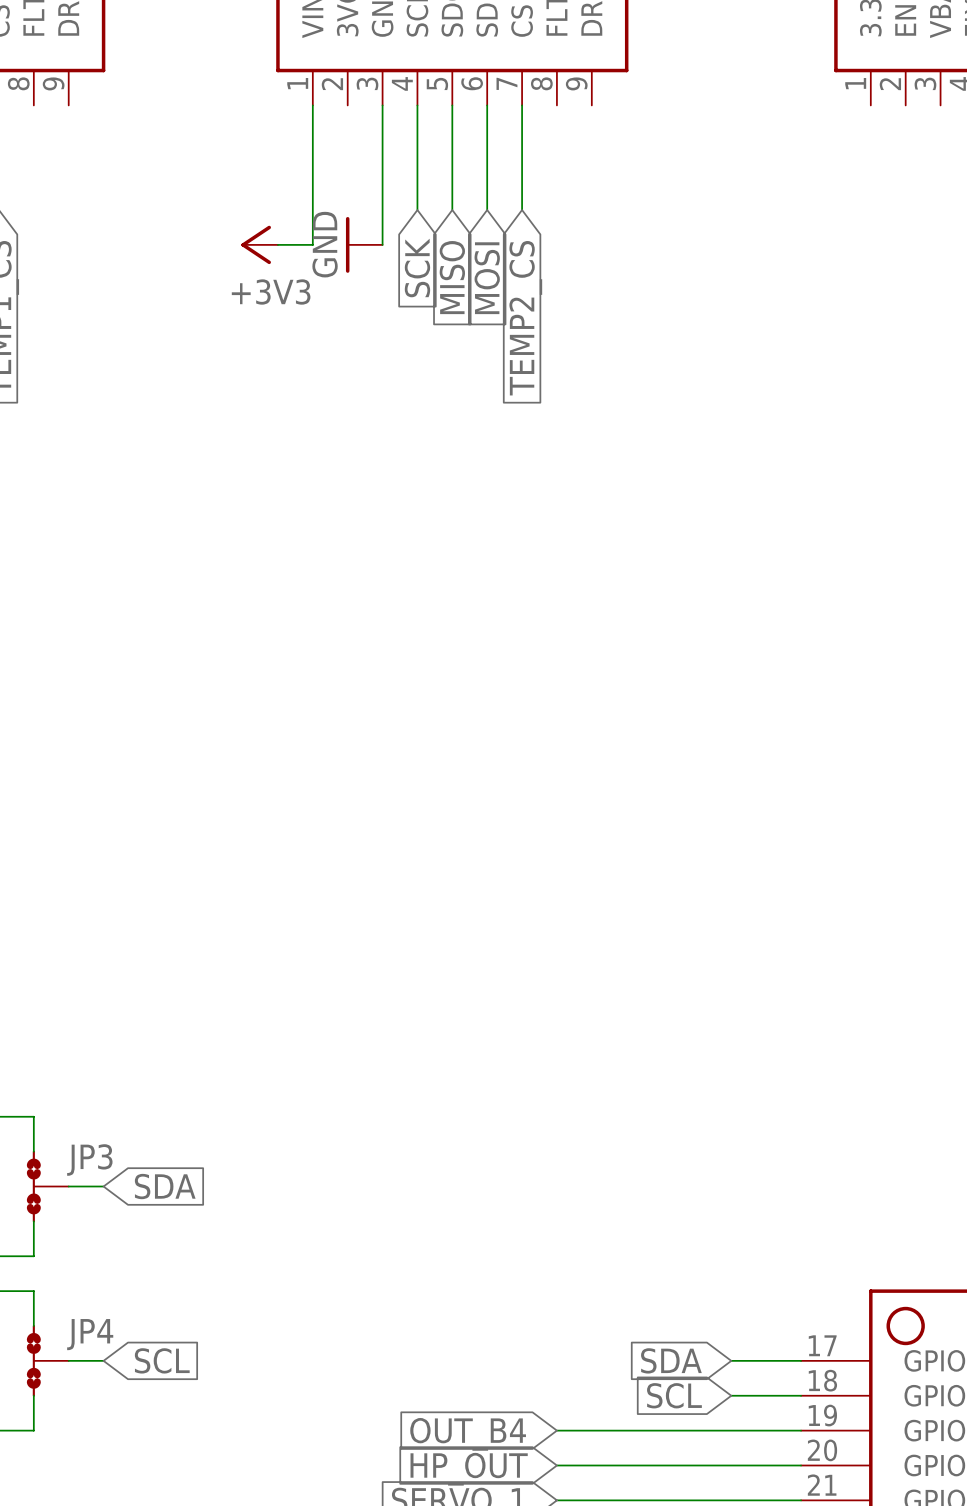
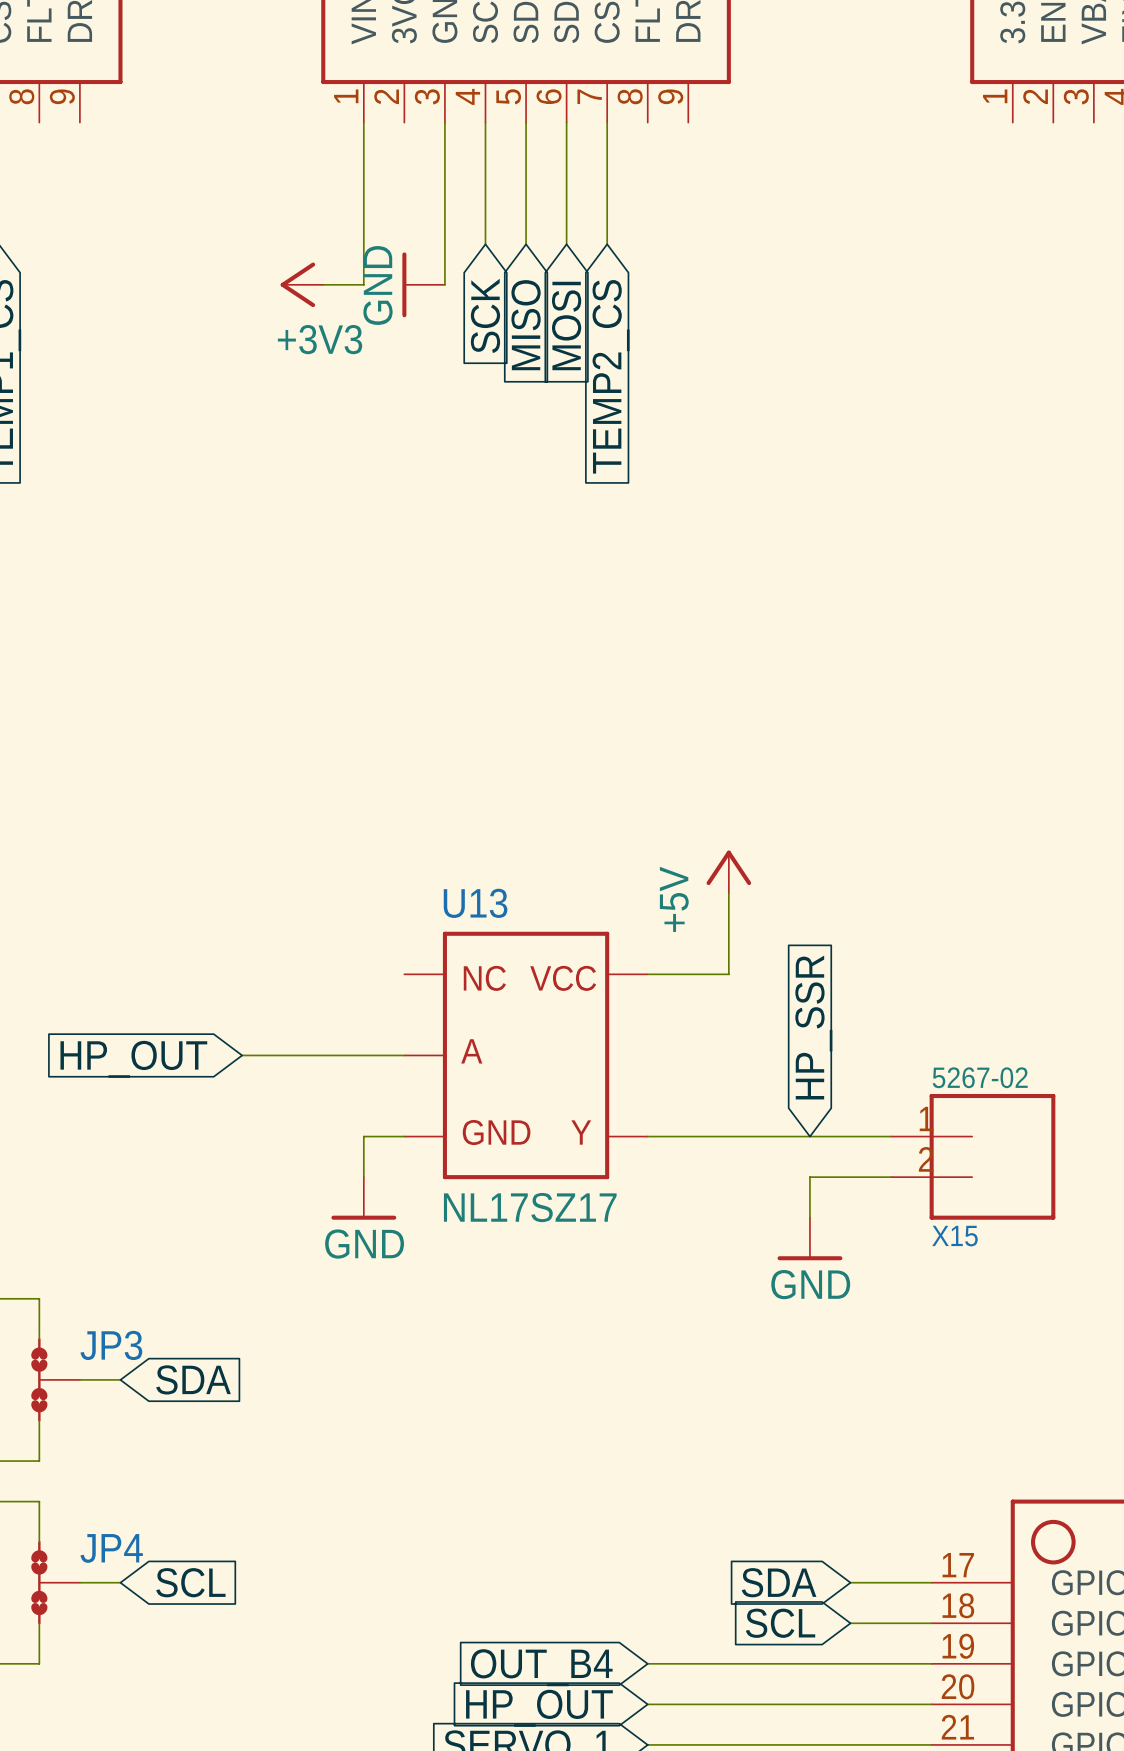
power symbol: none -> +5V (728, 871)
wire: none -> (728, 893) (728, 974) (647, 974)
global label: none -> HP_SSR (813, 1027)
wire: none -> (242, 1055) (404, 1055)
U13: none -> NL17SZ17 (526, 1055)
global label: none -> HP_OUT (133, 1059)
wire: none -> (404, 1136) (363, 1136) (363, 1177)
wire: none -> (647, 1136) (891, 1136)
X15: none -> 5267-02 (973, 1156)
wire: none -> (891, 1177) (809, 1177) (809, 1217)
power symbol: none -> GND (363, 1198)
power symbol: none -> GND (809, 1238)

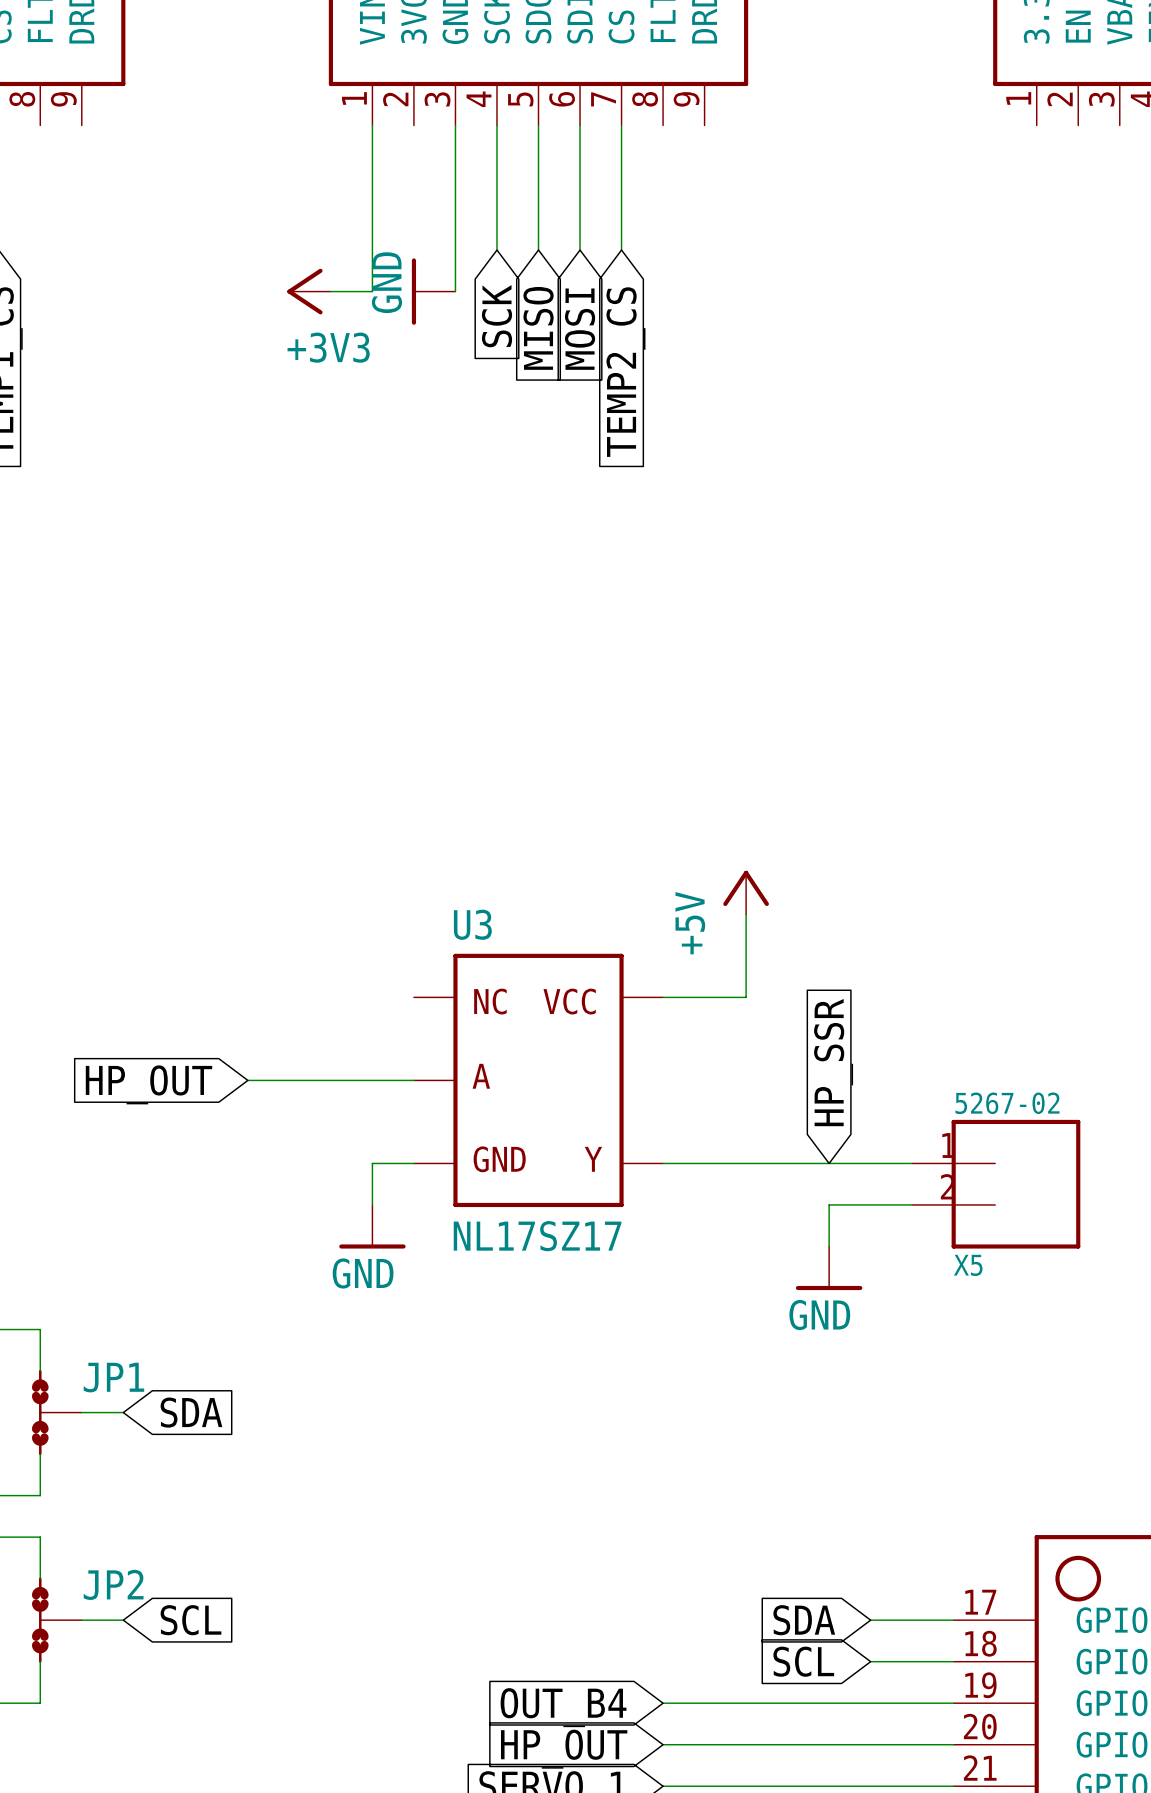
U13 name: U13 (475, 903) -> U3 (472, 924)
X15 name: X15 (954, 1236) -> X5 (968, 1265)
JP3 name: JP3 (111, 1345) -> JP1 (113, 1377)
JP4 name: JP4 (111, 1548) -> JP2 (113, 1584)

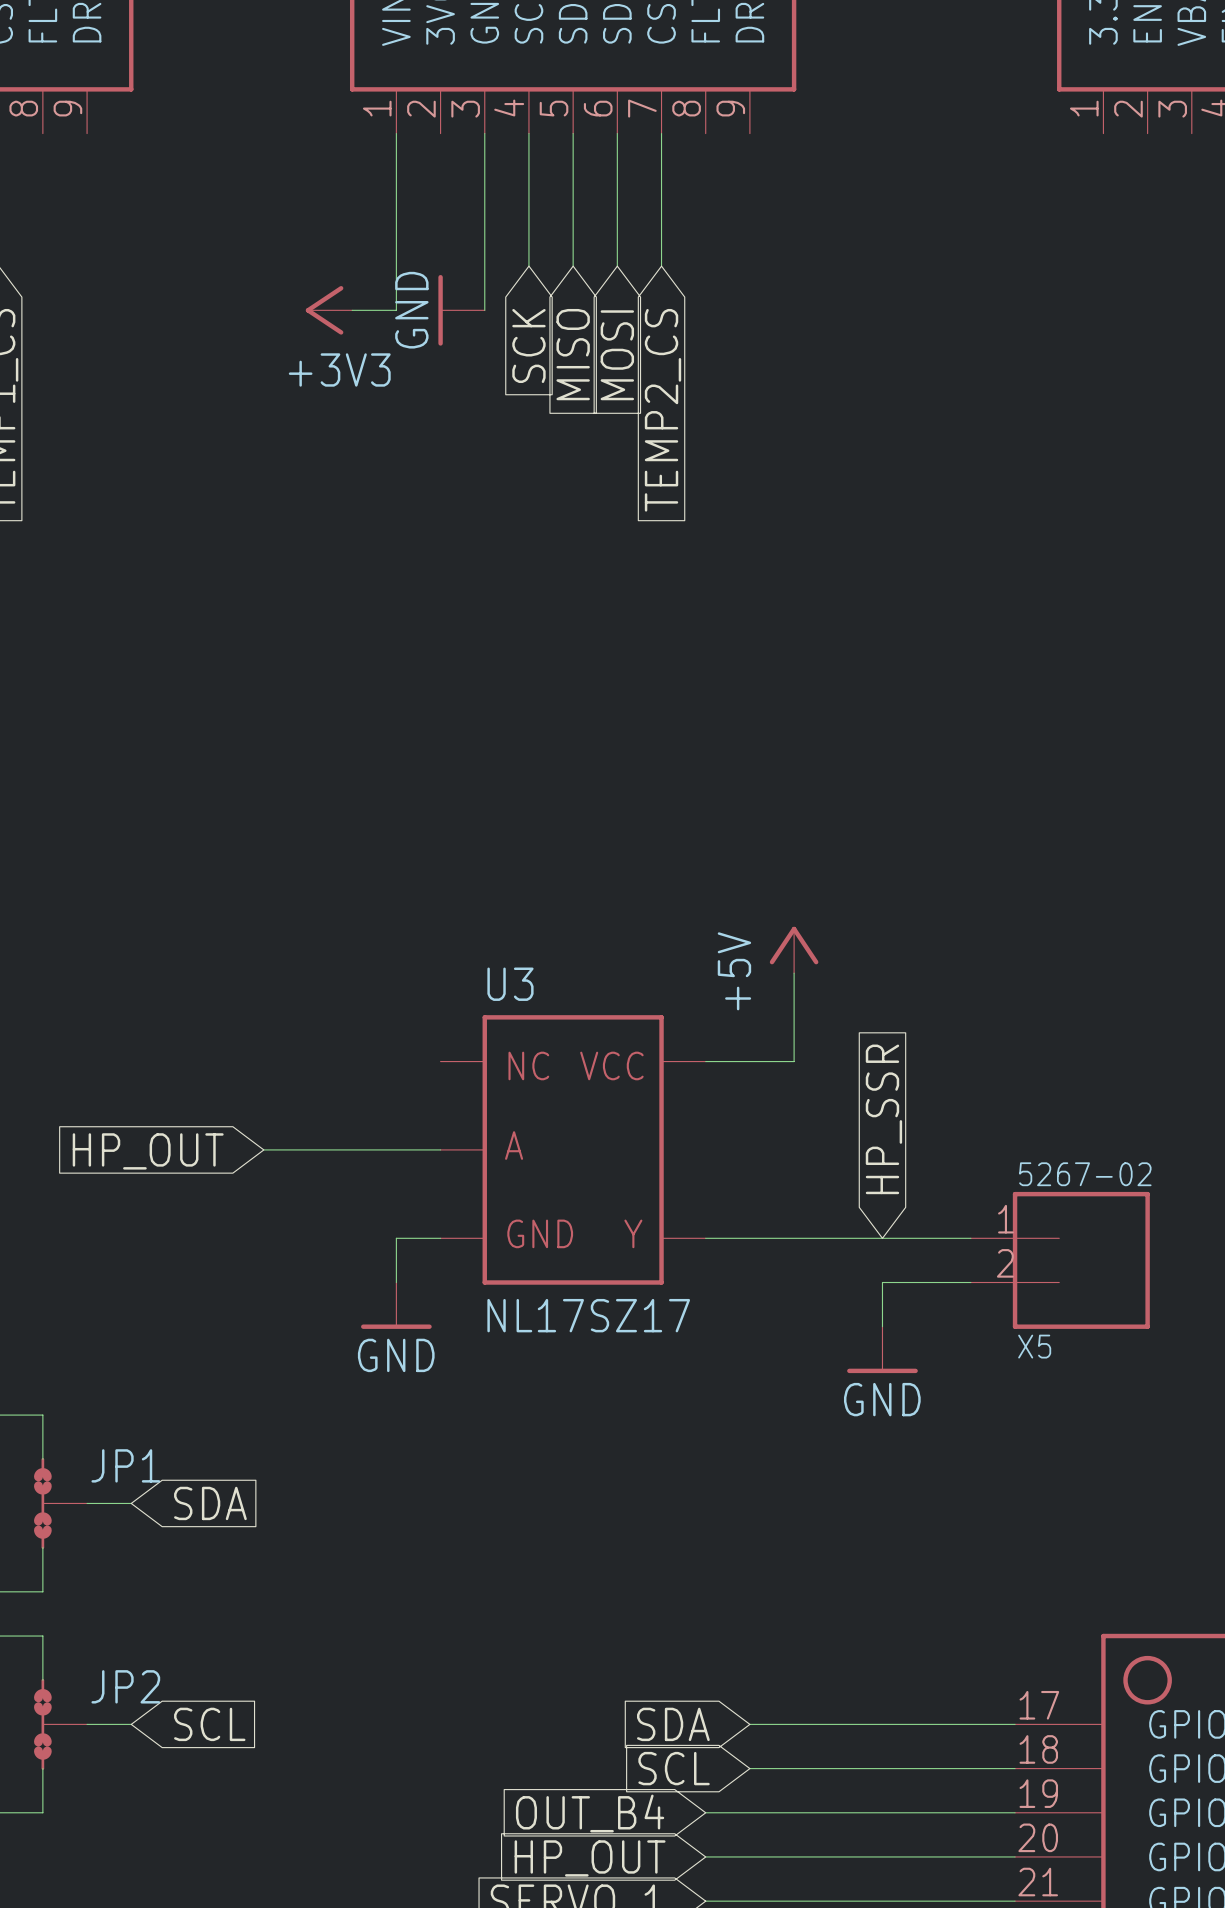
wire: none -> (749, 1724) (926, 1724)
global label position: SDA (804, 1620) -> SDA (673, 1724)
wire: none -> (749, 1768) (926, 1768)
global label position: SCL (803, 1661) -> SCL (674, 1768)

